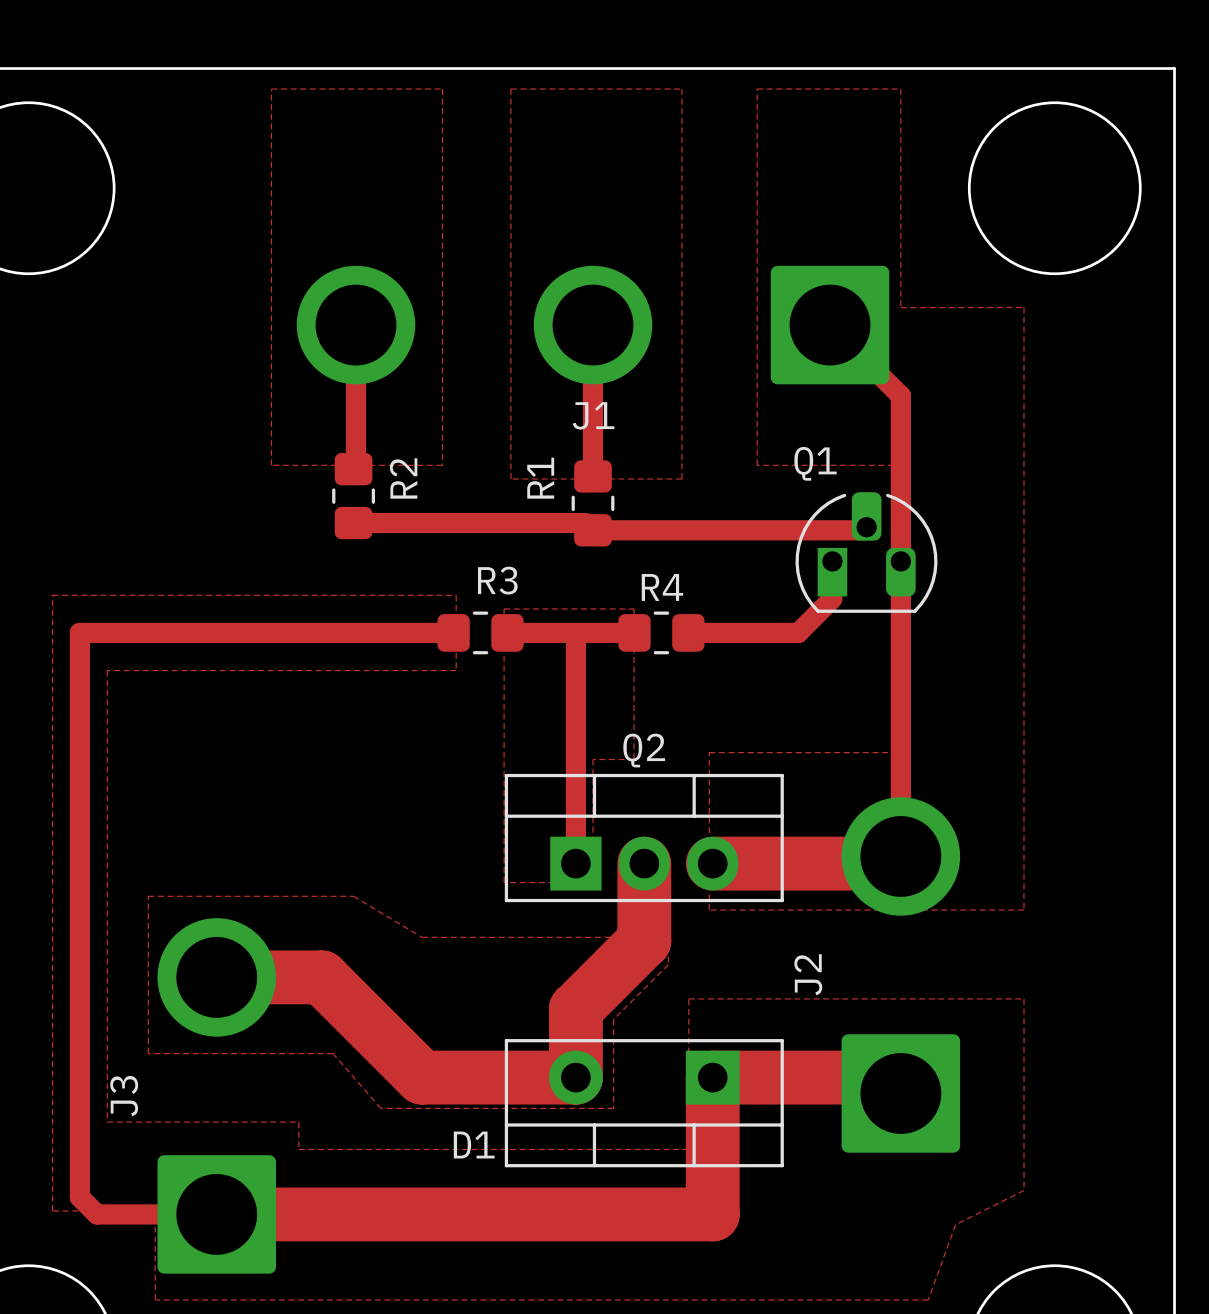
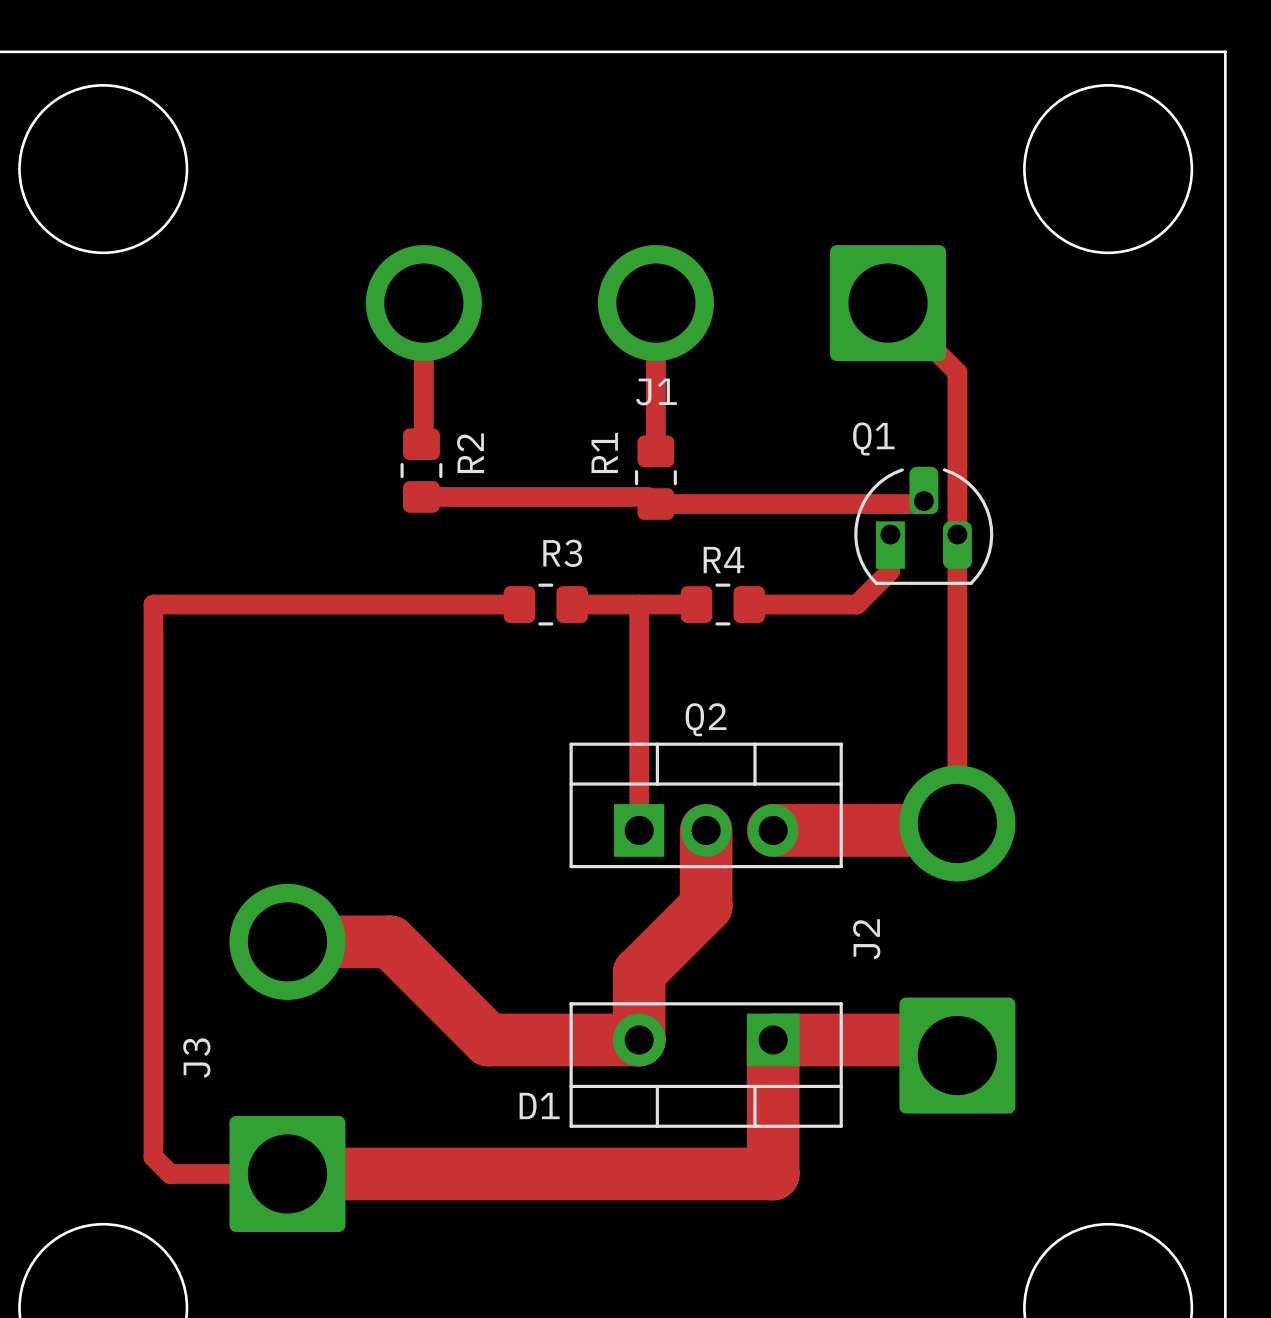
zone outline: (271, 89) (271, 465) (442, 465) (442, 89) (271, 89) -> none
zone outline: (510, 89) (681, 89) (681, 478) (510, 478) (510, 89) -> none
zone outline: (757, 89) (900, 89) (900, 307) (1023, 307) (1023, 909) (709, 909) (709, 752) (894, 752) (894, 465) (757, 465) (757, 89) -> none
zone outline: (52, 595) (52, 1211) (155, 1211) (155, 1299) (928, 1299) (955, 1224) (1024, 1190) (1024, 998) (688, 998) (688, 1149) (298, 1149) (298, 1122) (107, 1122) (107, 670) (456, 670) (456, 595) (52, 595) -> none
zone outline: (504, 608) (504, 882) (593, 882) (593, 759) (634, 759) (634, 608) (504, 608) -> none
zone outline: (148, 896) (148, 1053) (333, 1053) (380, 1108) (613, 1108) (613, 1019) (668, 964) (668, 937) (421, 937) (353, 896) (148, 896) -> none

